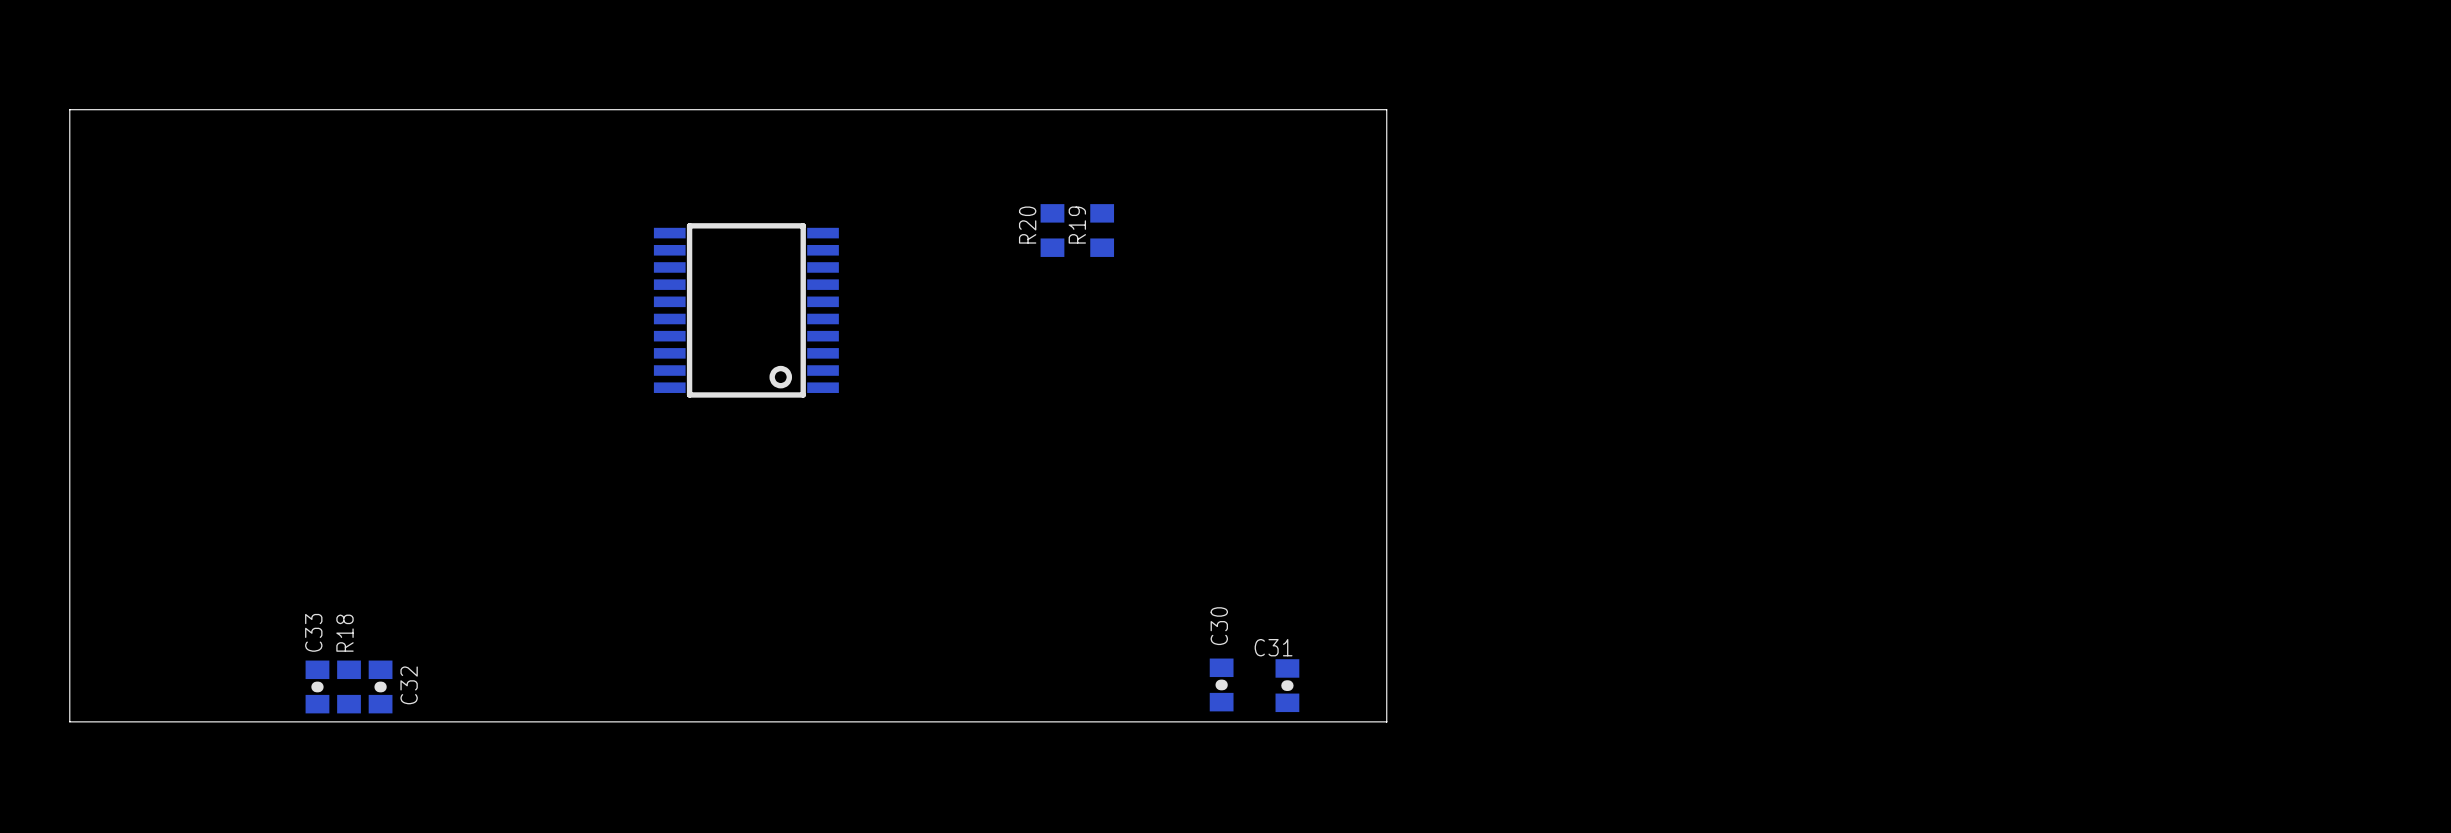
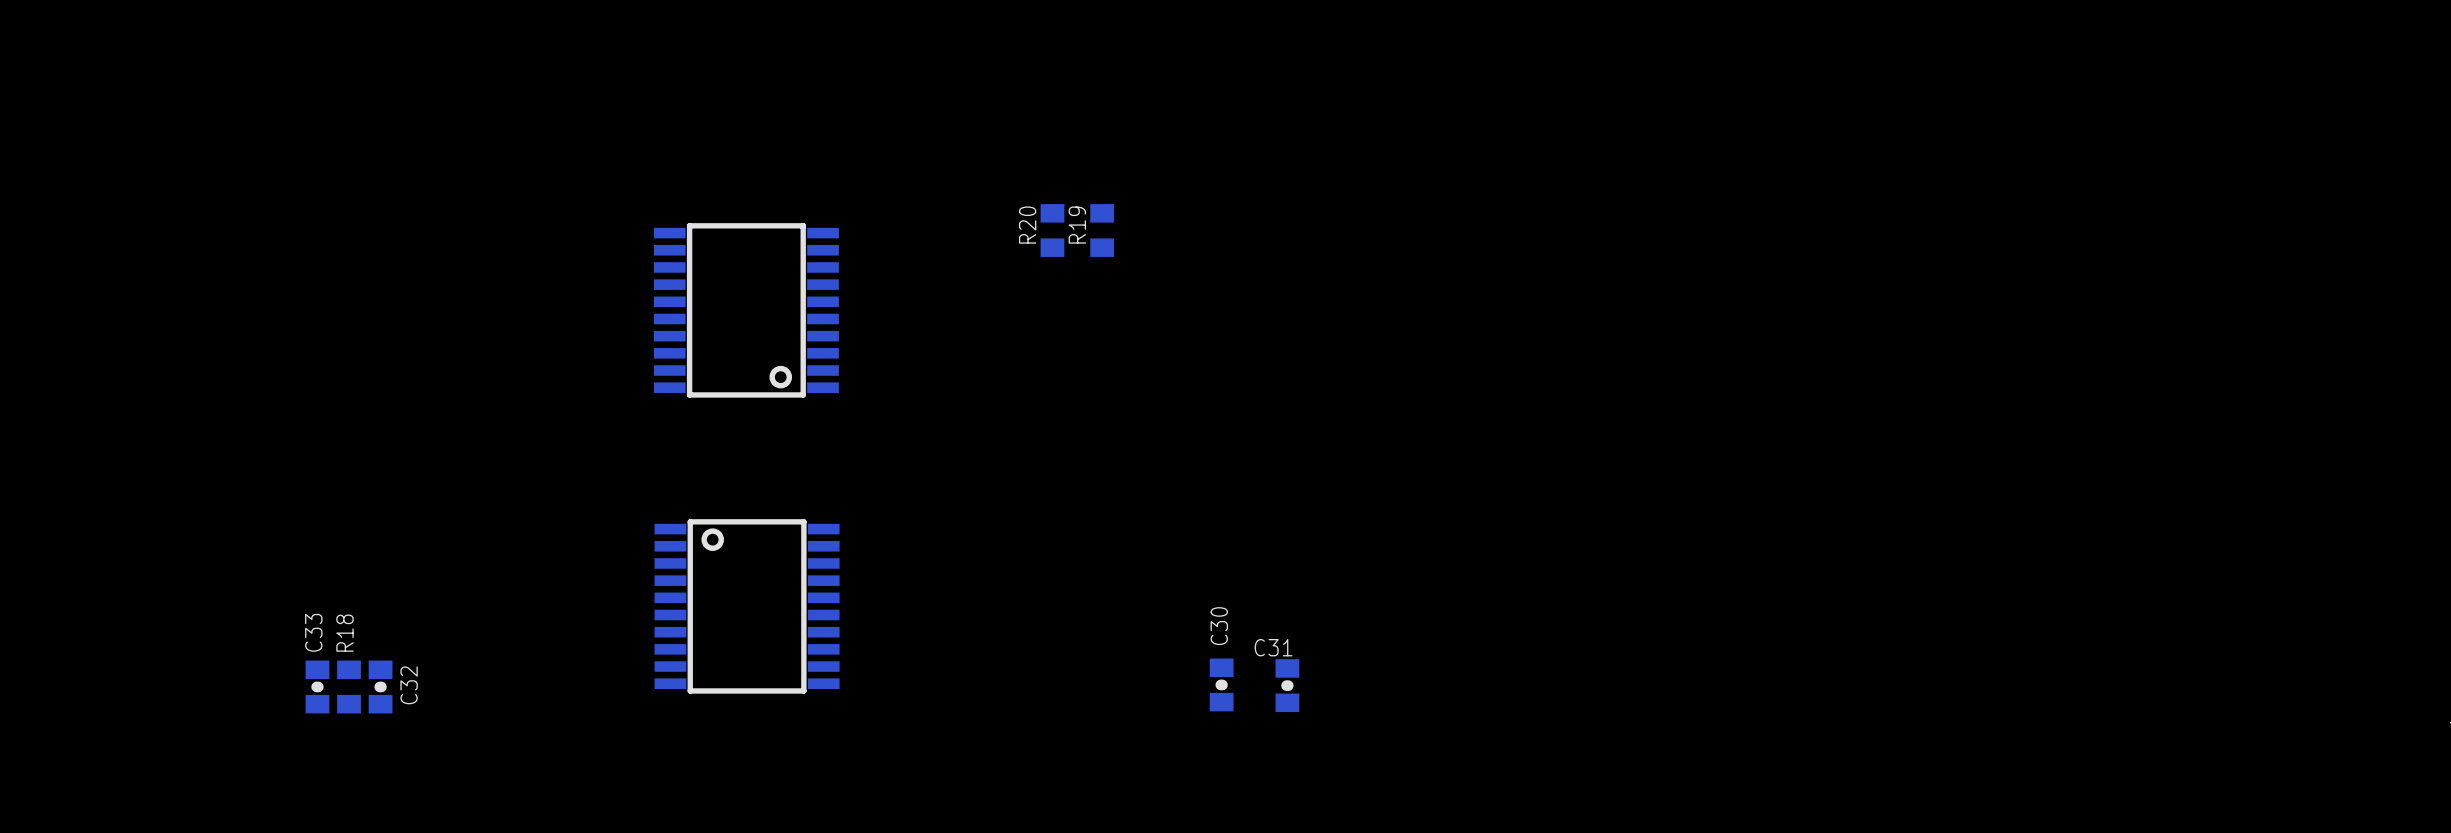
part: none -> (747, 606)
board edge: (1386, 721) (69, 721) (69, 109) (1386, 109) (1386, 722) -> none

